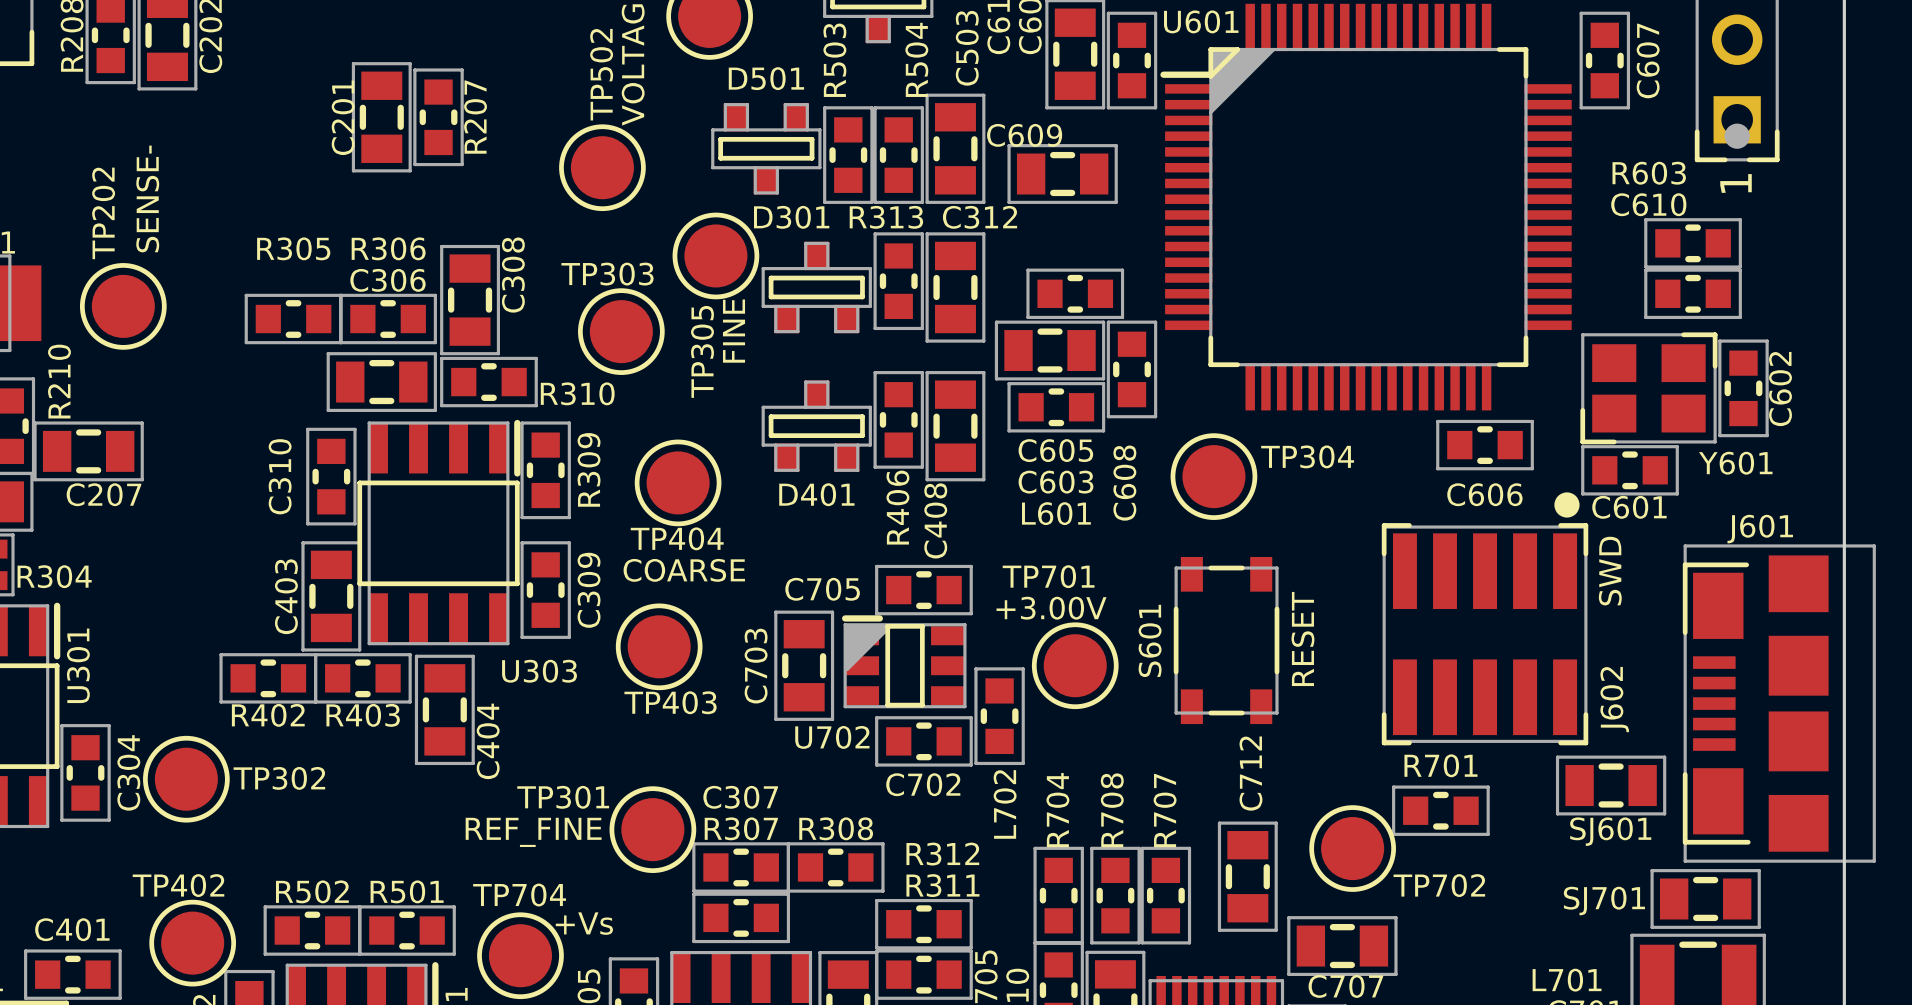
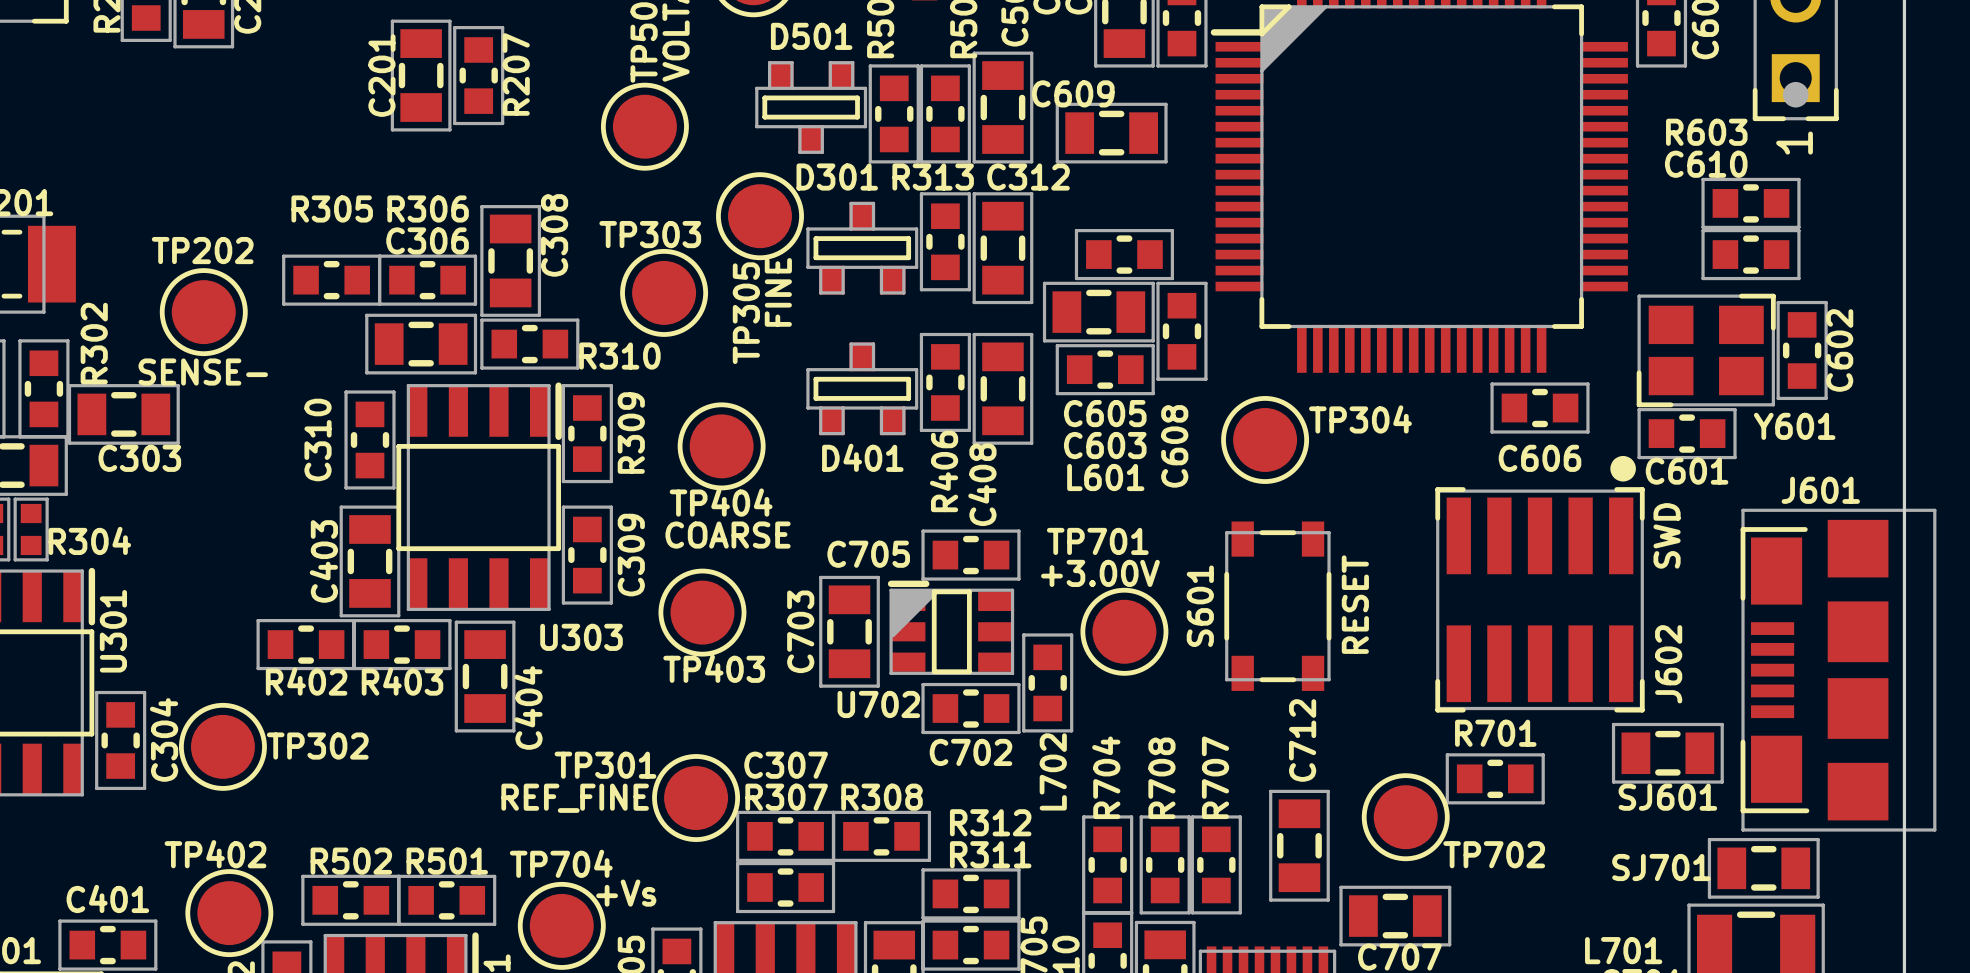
TP202 value rotation: 0° (147, 198) -> 90° clockwise (203, 372)
TP202 value position: SENSE- (147, 198) -> SENSE- (203, 372)
TP202 name rotation: 0° (103, 213) -> 90° clockwise (202, 250)
TP202 position: (123, 306) -> (203, 312)
R210 name: R210 (59, 381) -> R302 (94, 343)
C207 name: C207 (103, 494) -> C303 (139, 458)

